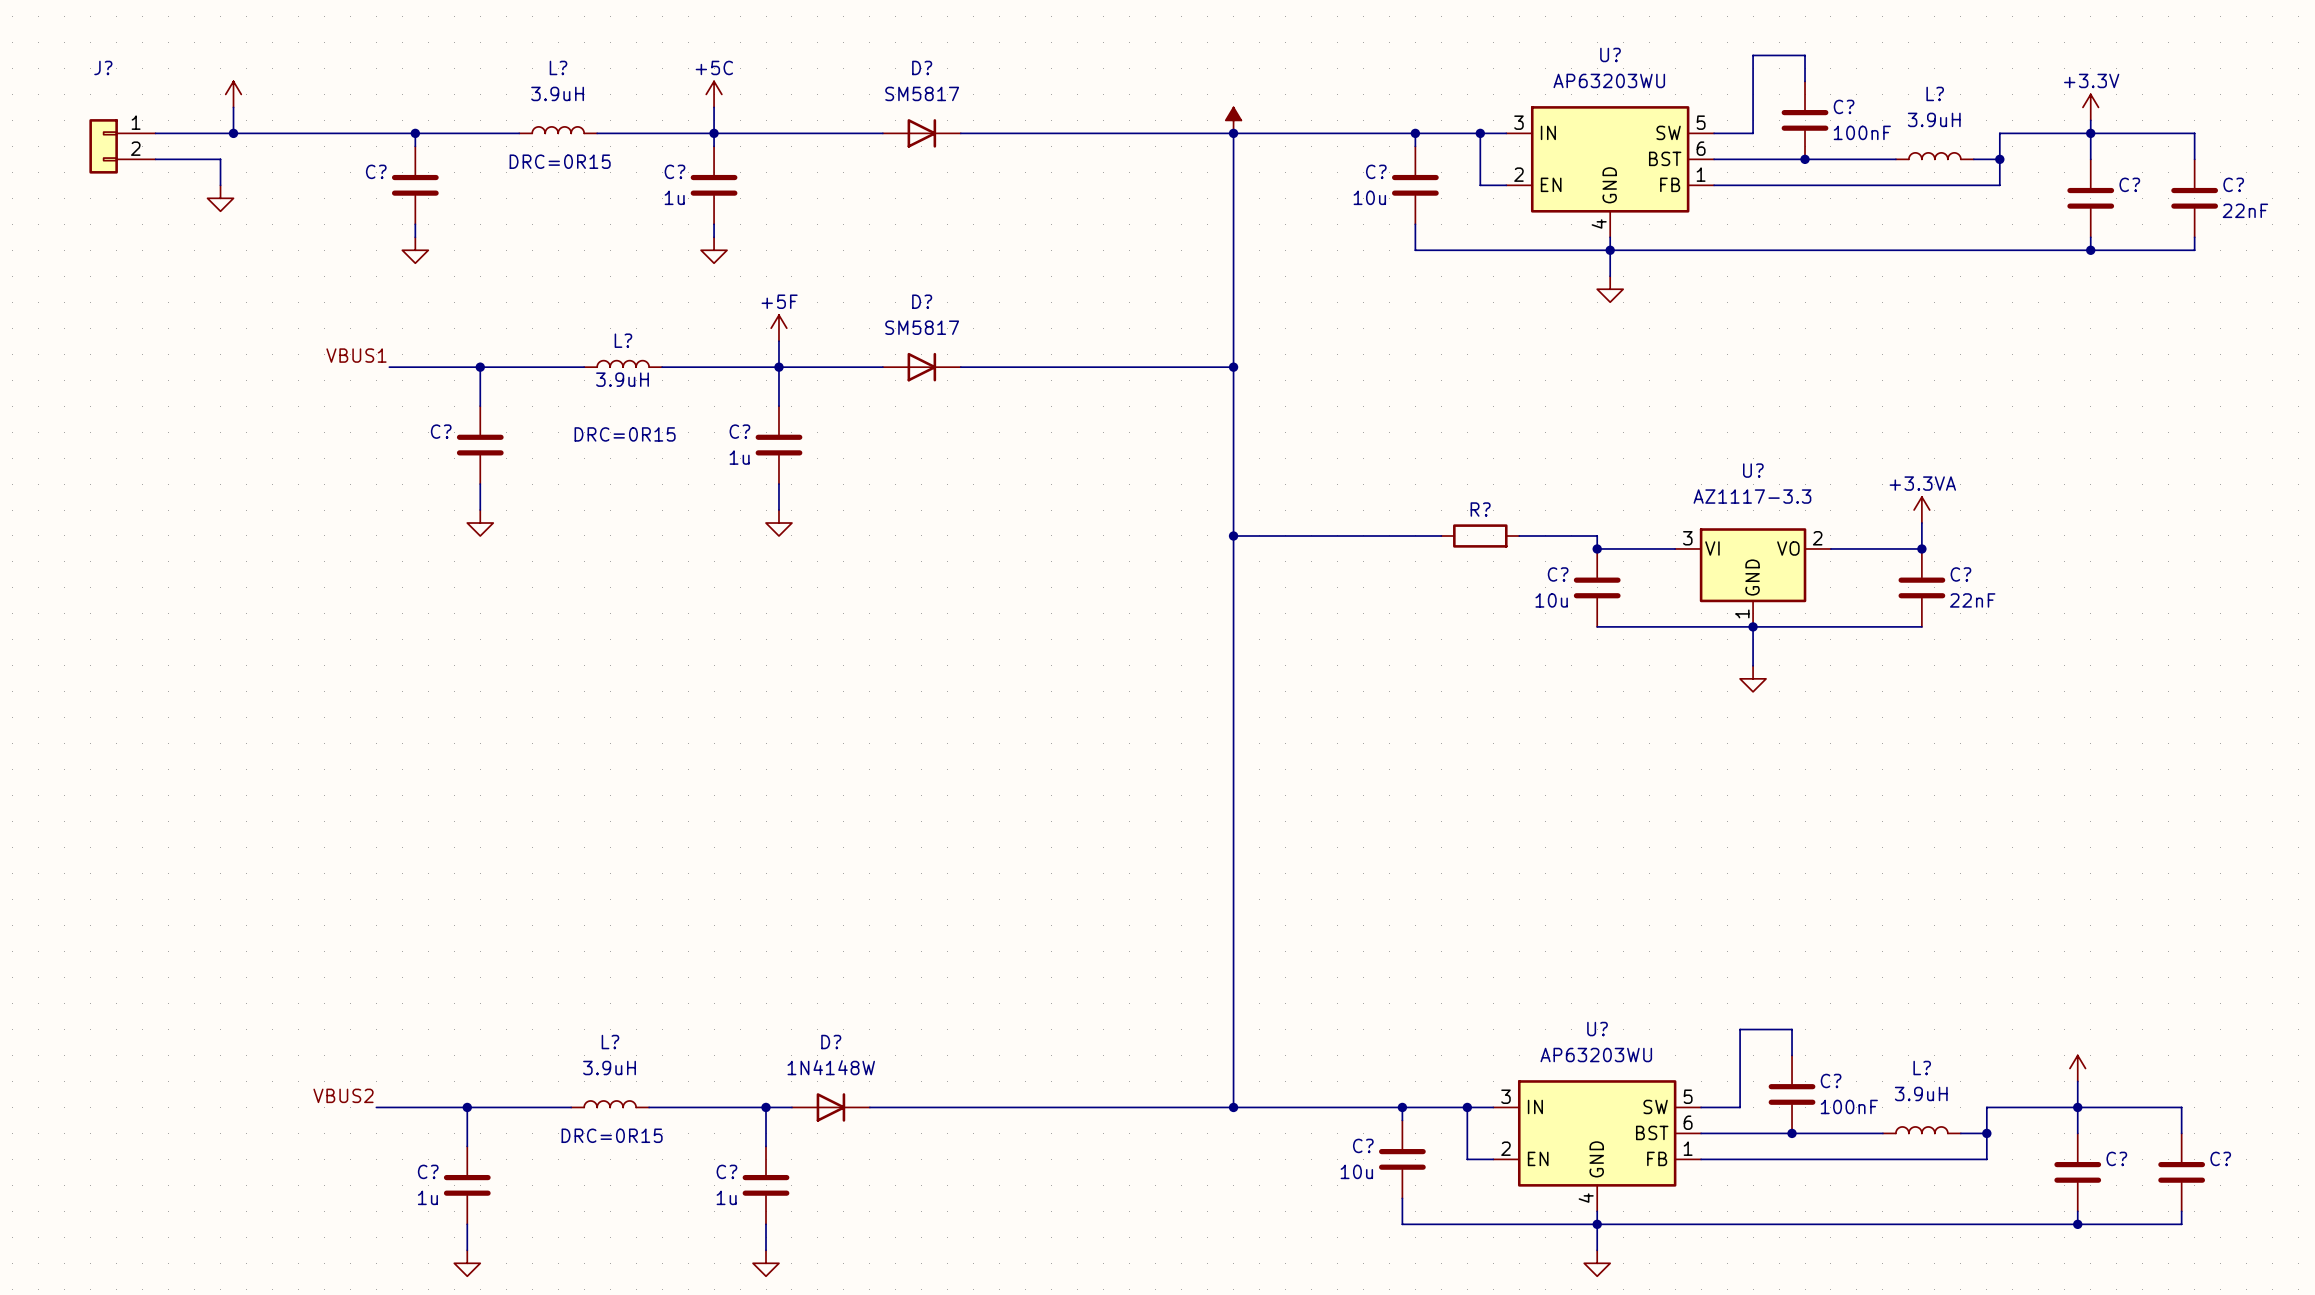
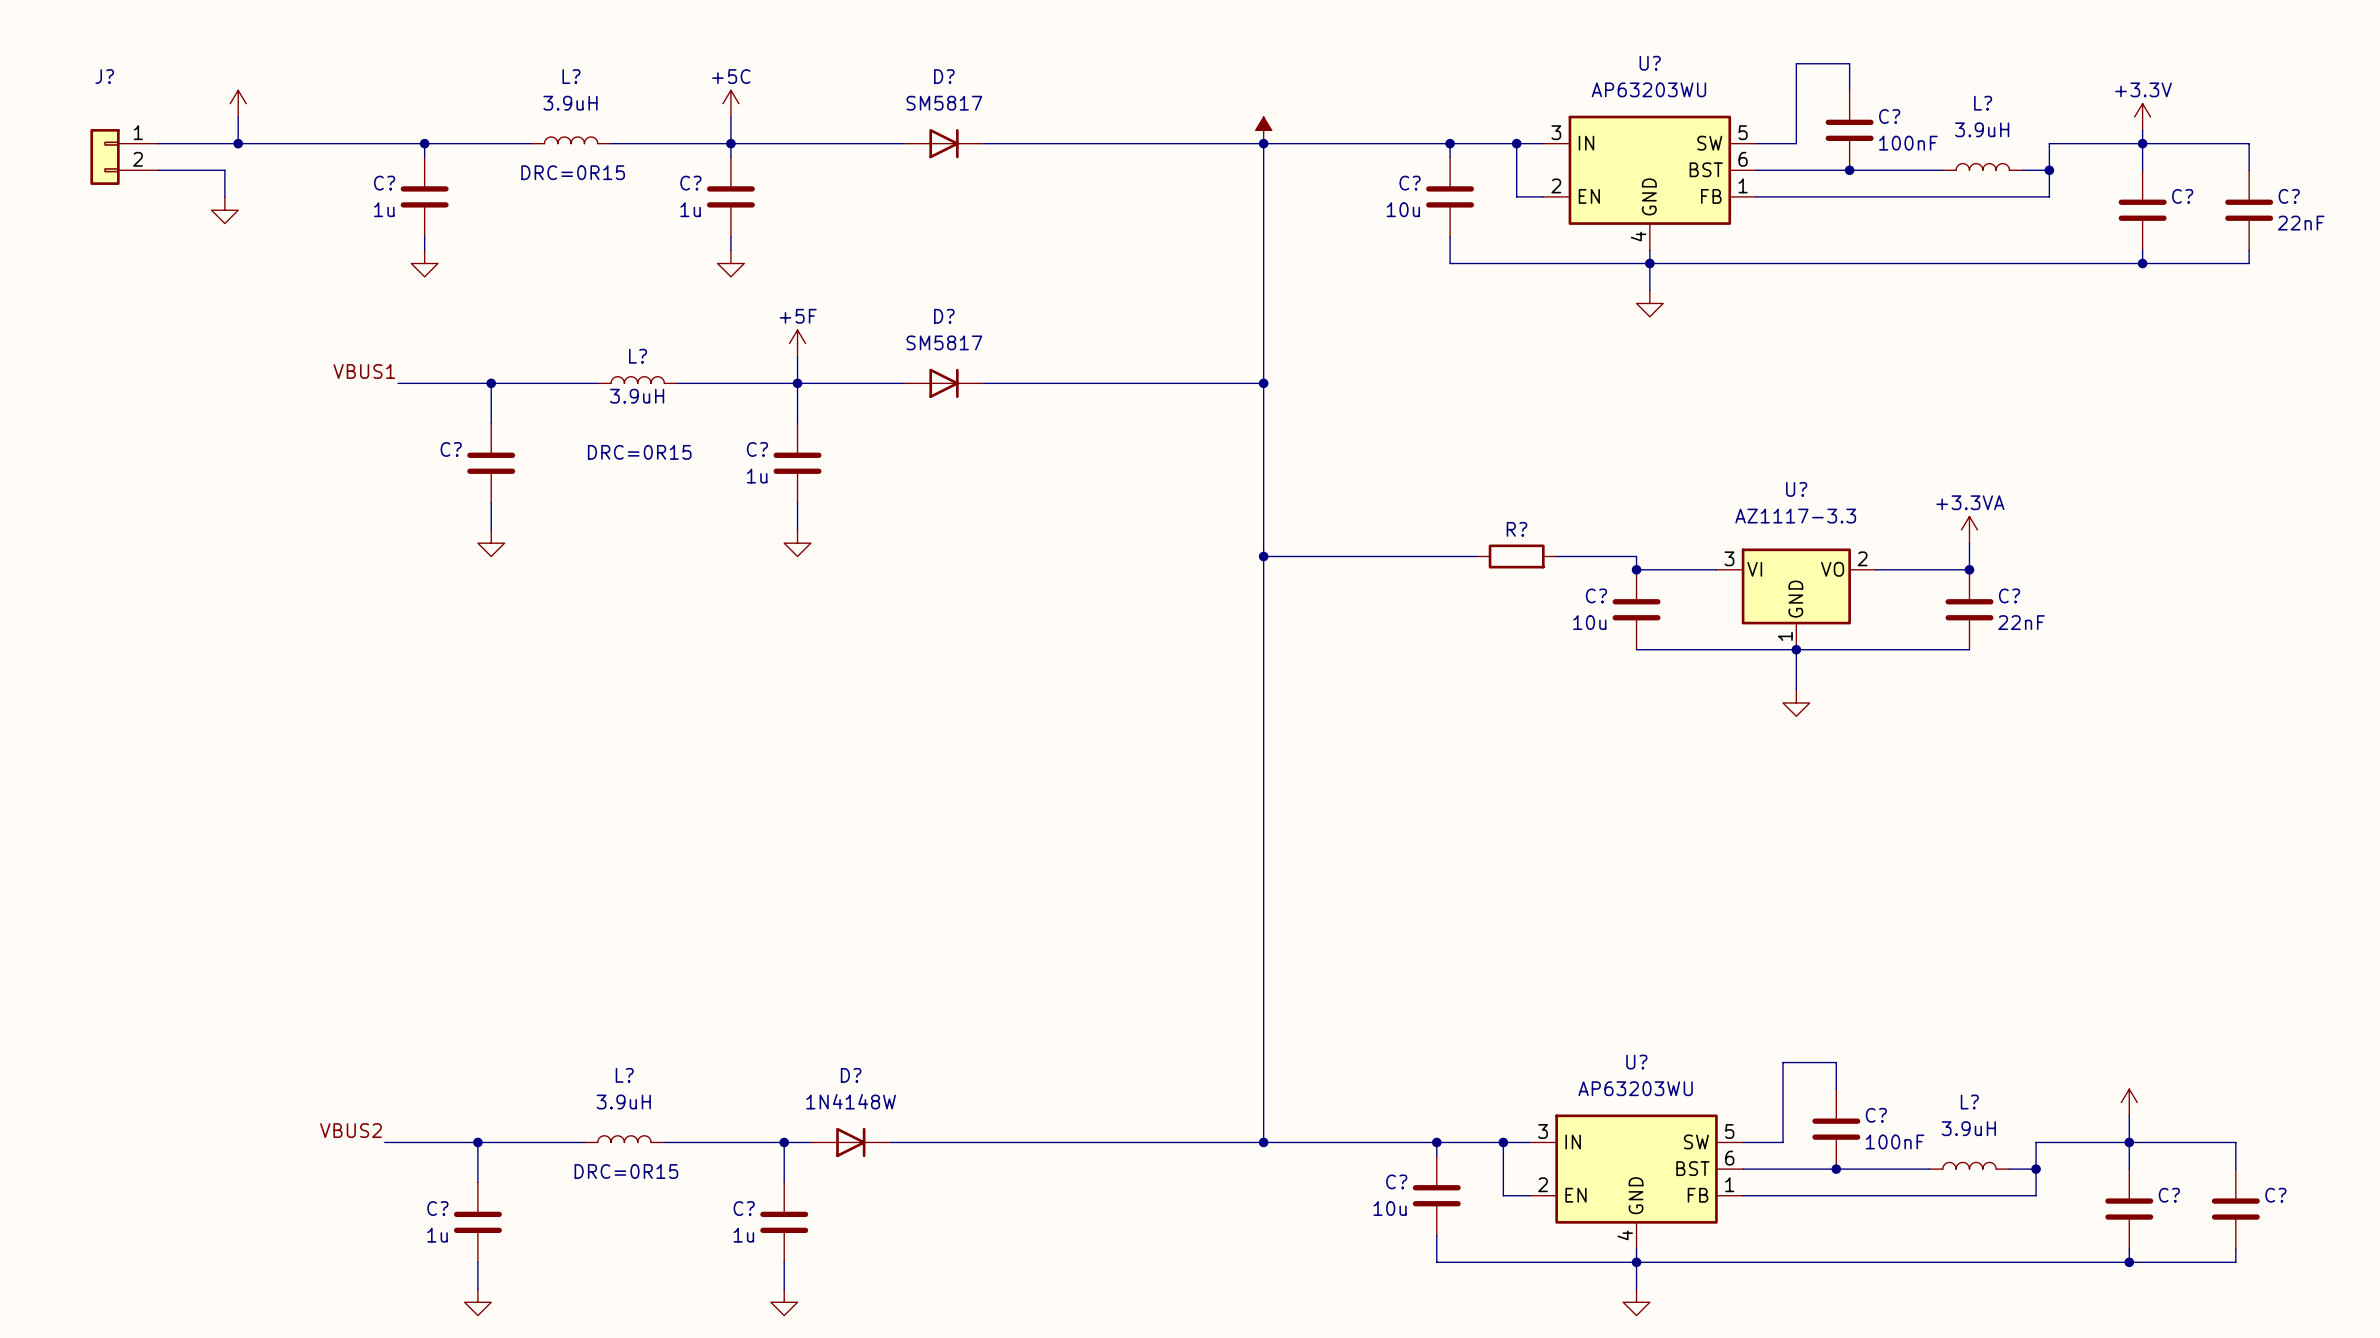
C? value: none -> 1u (384, 209)

